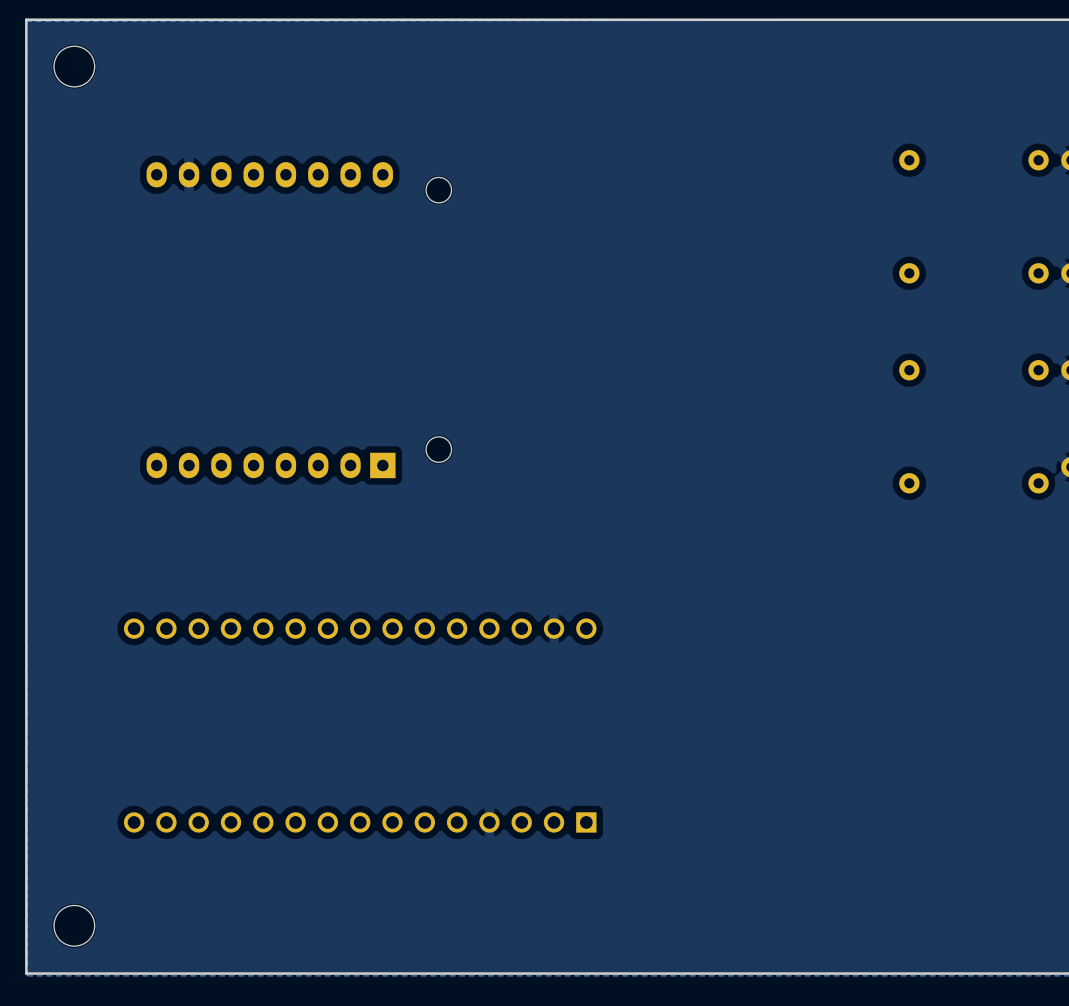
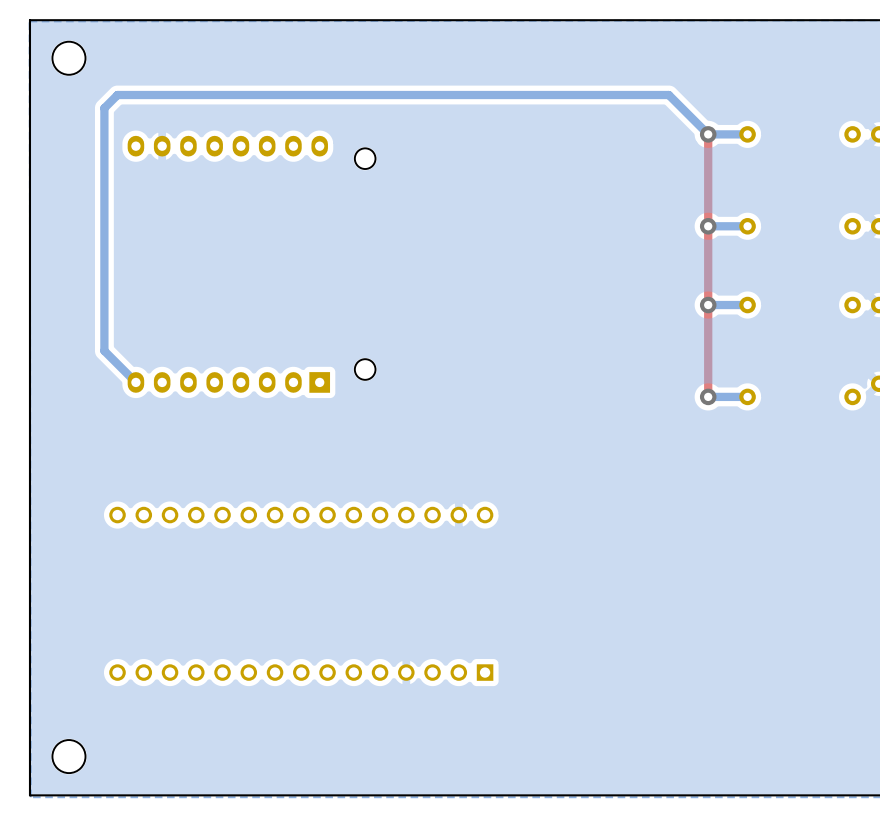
top track: none -> (708, 134) (708, 396)
via: none -> (708, 134)
bottom track: none -> (747, 134) (708, 134) (668, 95) (117, 95) (104, 108) (104, 350) (135, 382)
via: none -> (708, 226)
bottom track: none -> (747, 226) (708, 226)
via: none -> (708, 305)
bottom track: none -> (747, 305) (708, 305)
via: none -> (708, 396)
bottom track: none -> (747, 396) (708, 396)

